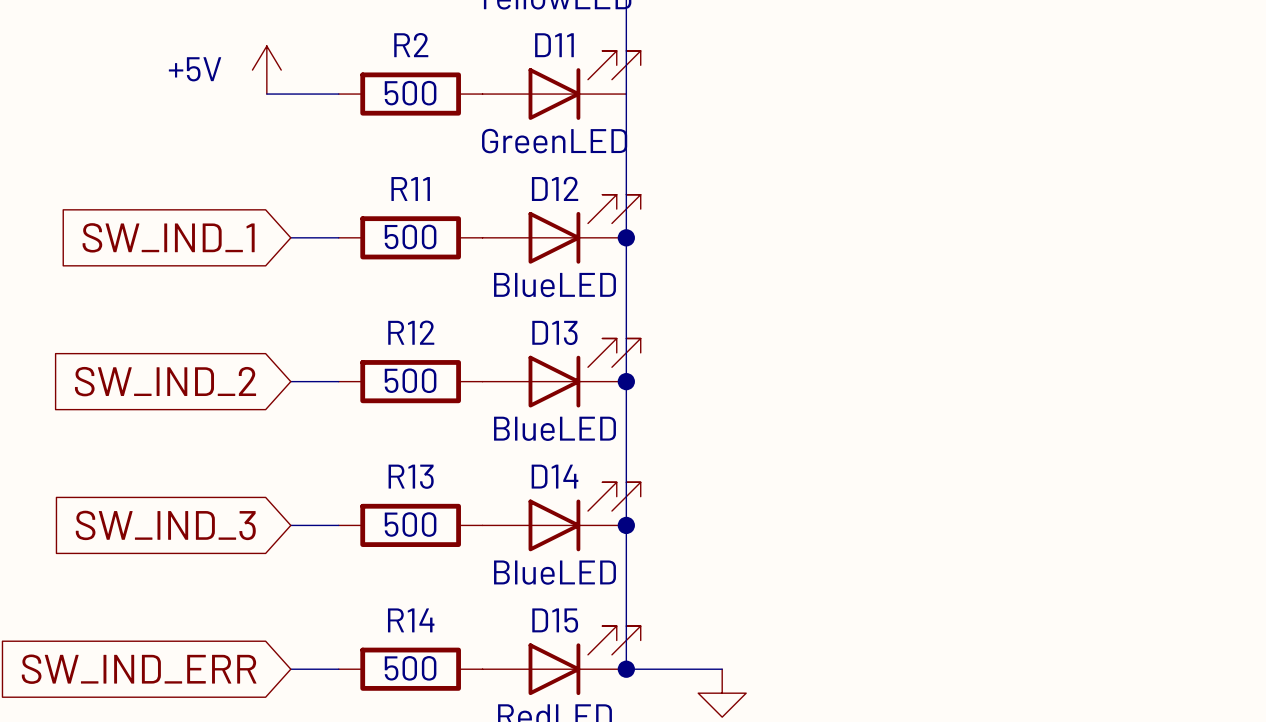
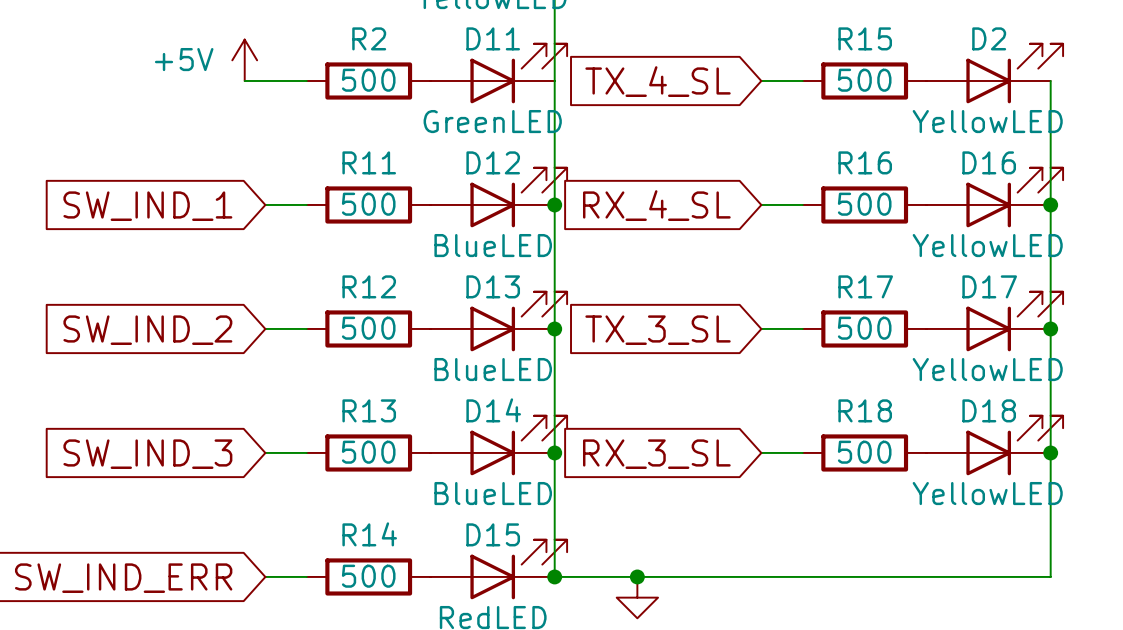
D2: none -> YellowLED (994, 73)
global label: none -> TX_4_SL (658, 81)
wire: none -> (761, 80) (802, 80)
R15: none -> 500 (864, 80)
wire: none -> (1050, 80) (1050, 576) (637, 576)
D16: none -> YellowLED (994, 197)
global label: none -> RX_4_SL (656, 205)
wire: none -> (761, 204) (802, 204)
R16: none -> 500 (864, 204)
junction: none -> (1050, 204)
D17: none -> YellowLED (994, 321)
global label: none -> TX_3_SL (658, 330)
wire: none -> (761, 328) (802, 328)
R17: none -> 500 (864, 328)
junction: none -> (1050, 328)
D18: none -> YellowLED (994, 445)
global label: none -> RX_3_SL (656, 454)
wire: none -> (761, 452) (802, 452)
R18: none -> 500 (864, 452)
junction: none -> (1050, 452)
junction: none -> (637, 576)

